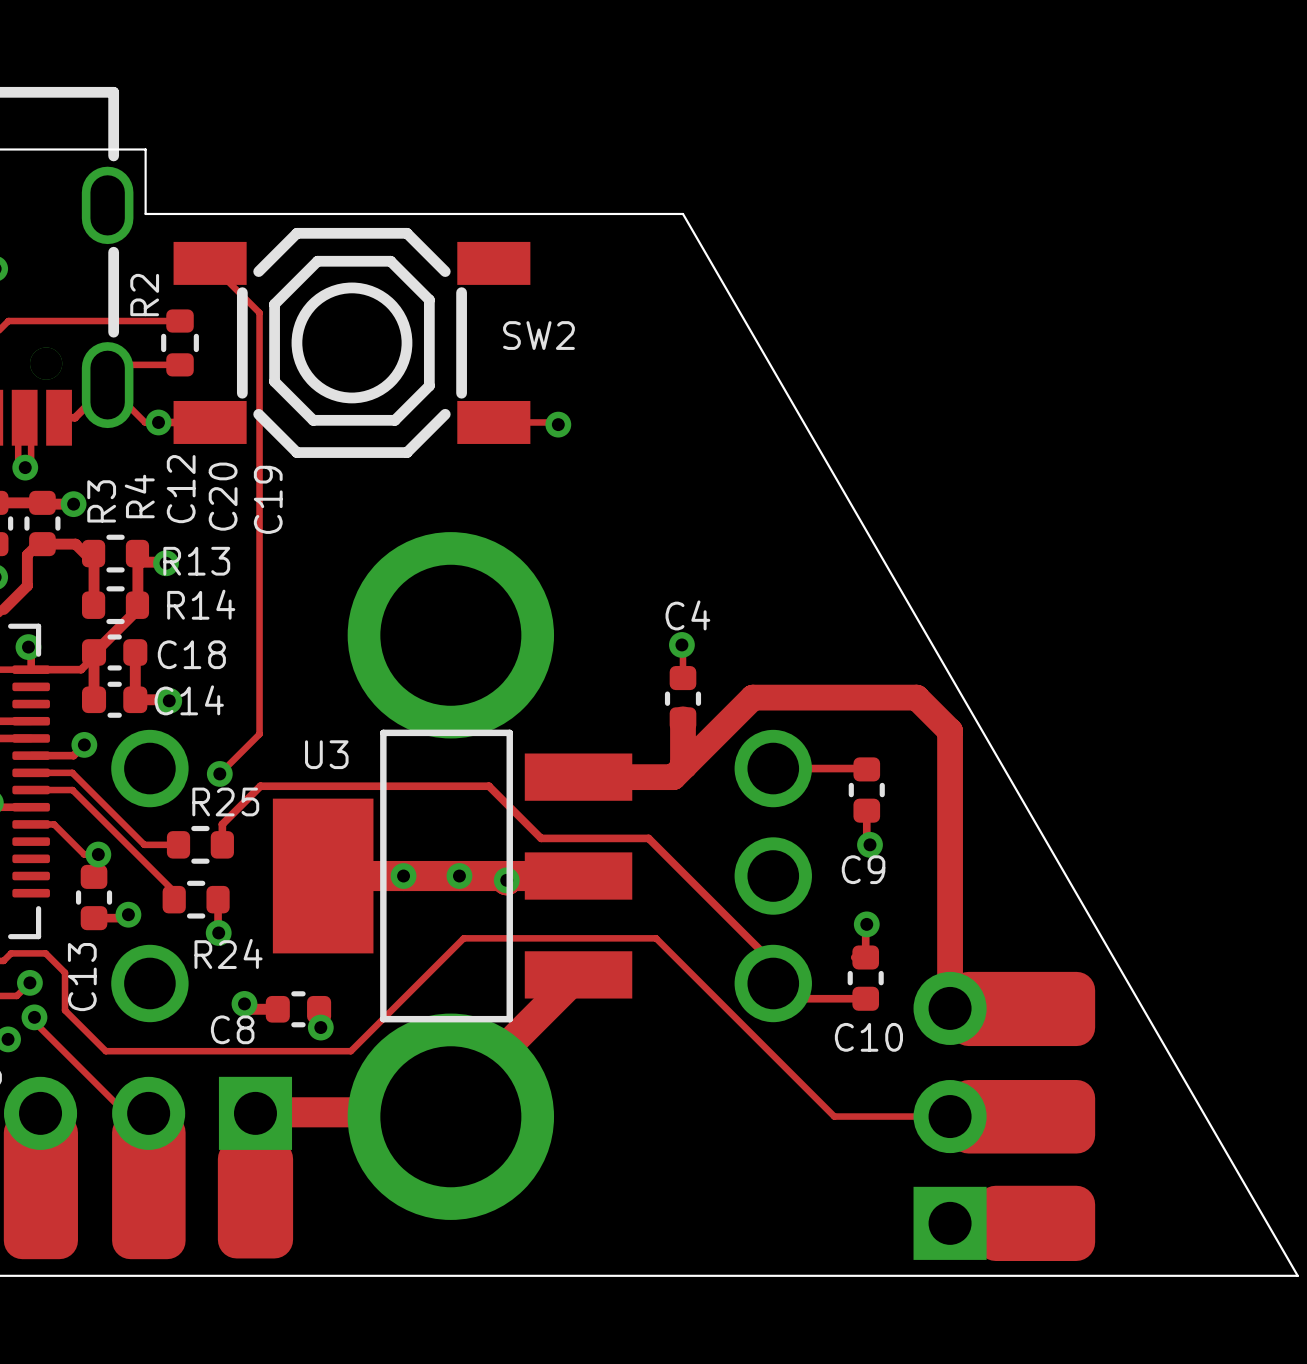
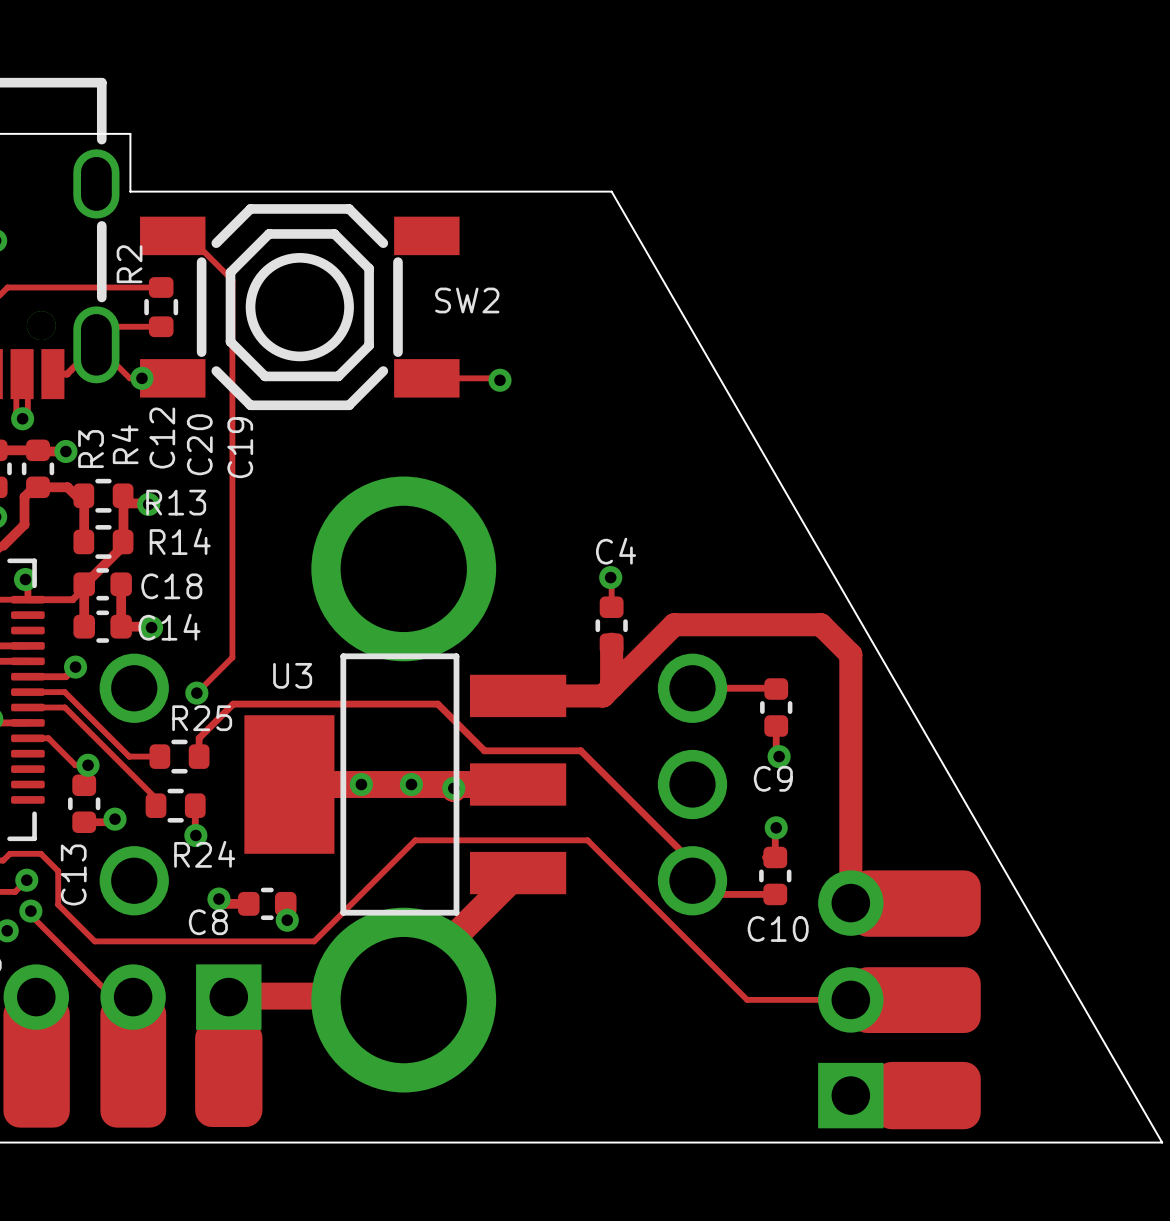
SW2 position: (351, 342) -> (299, 307)

